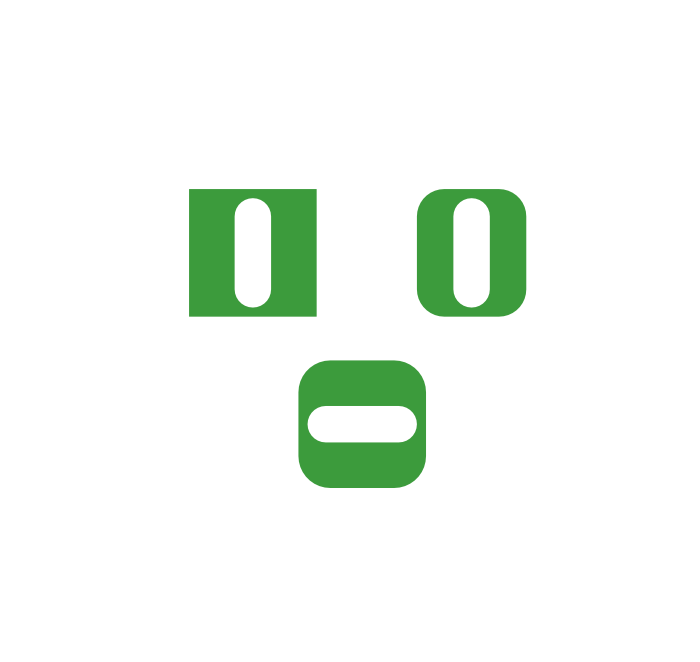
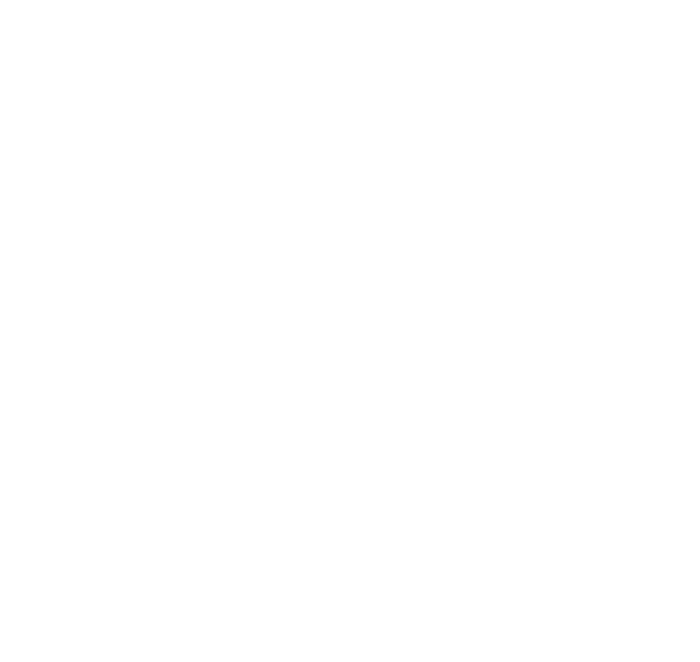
part: (357, 338) -> none

